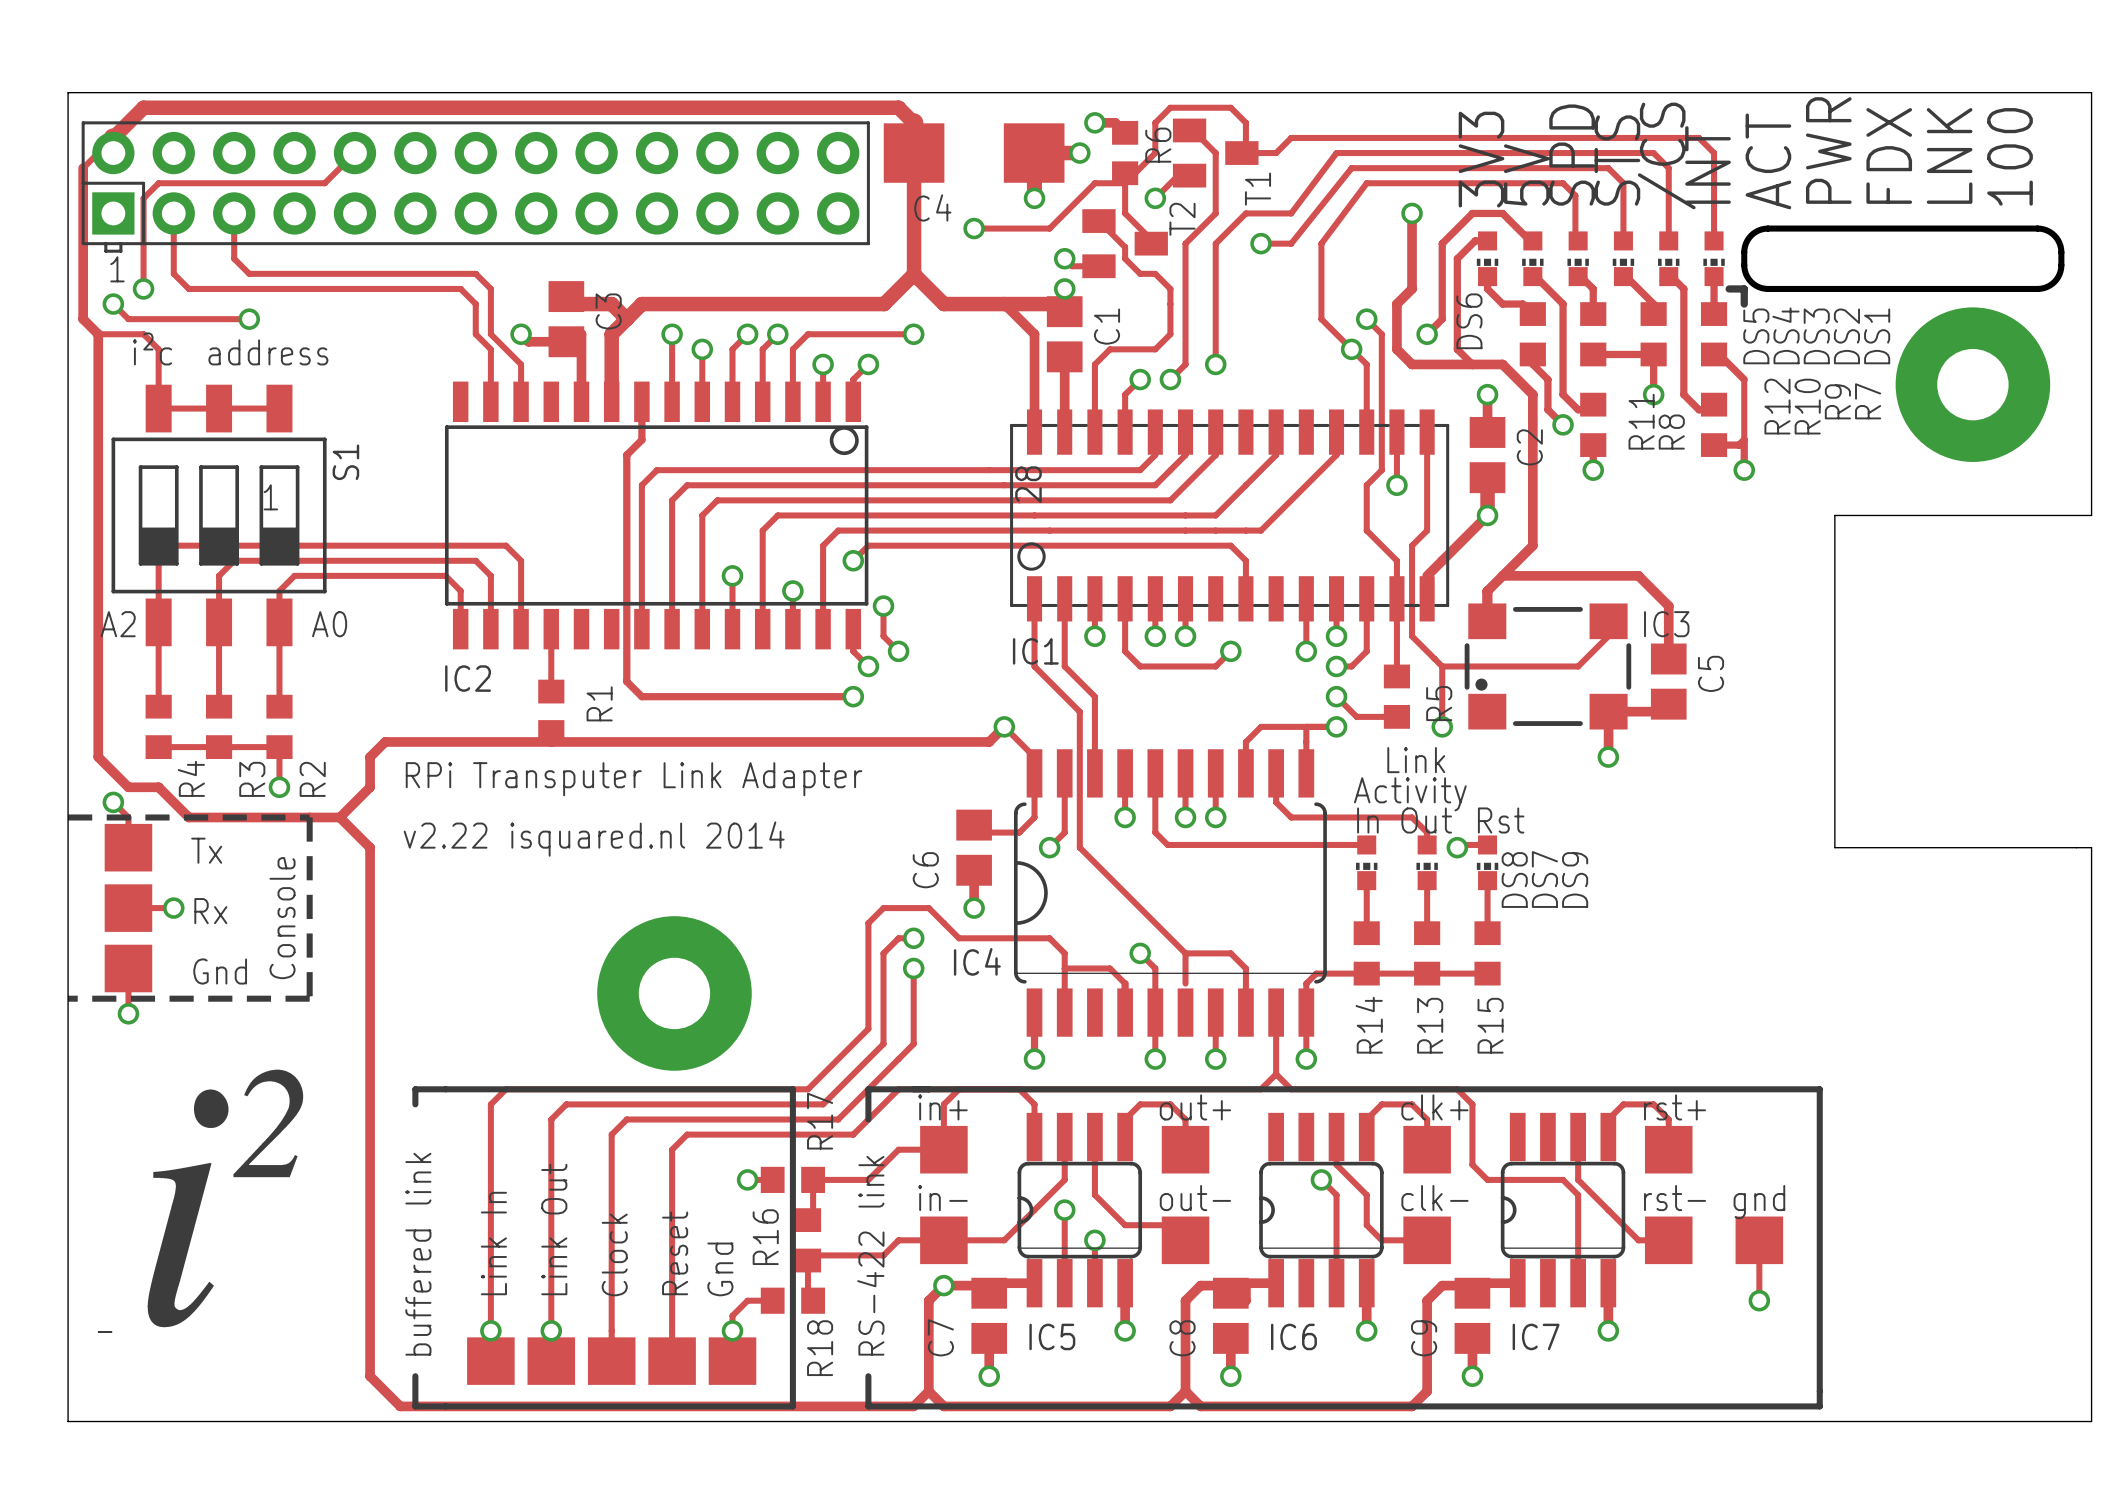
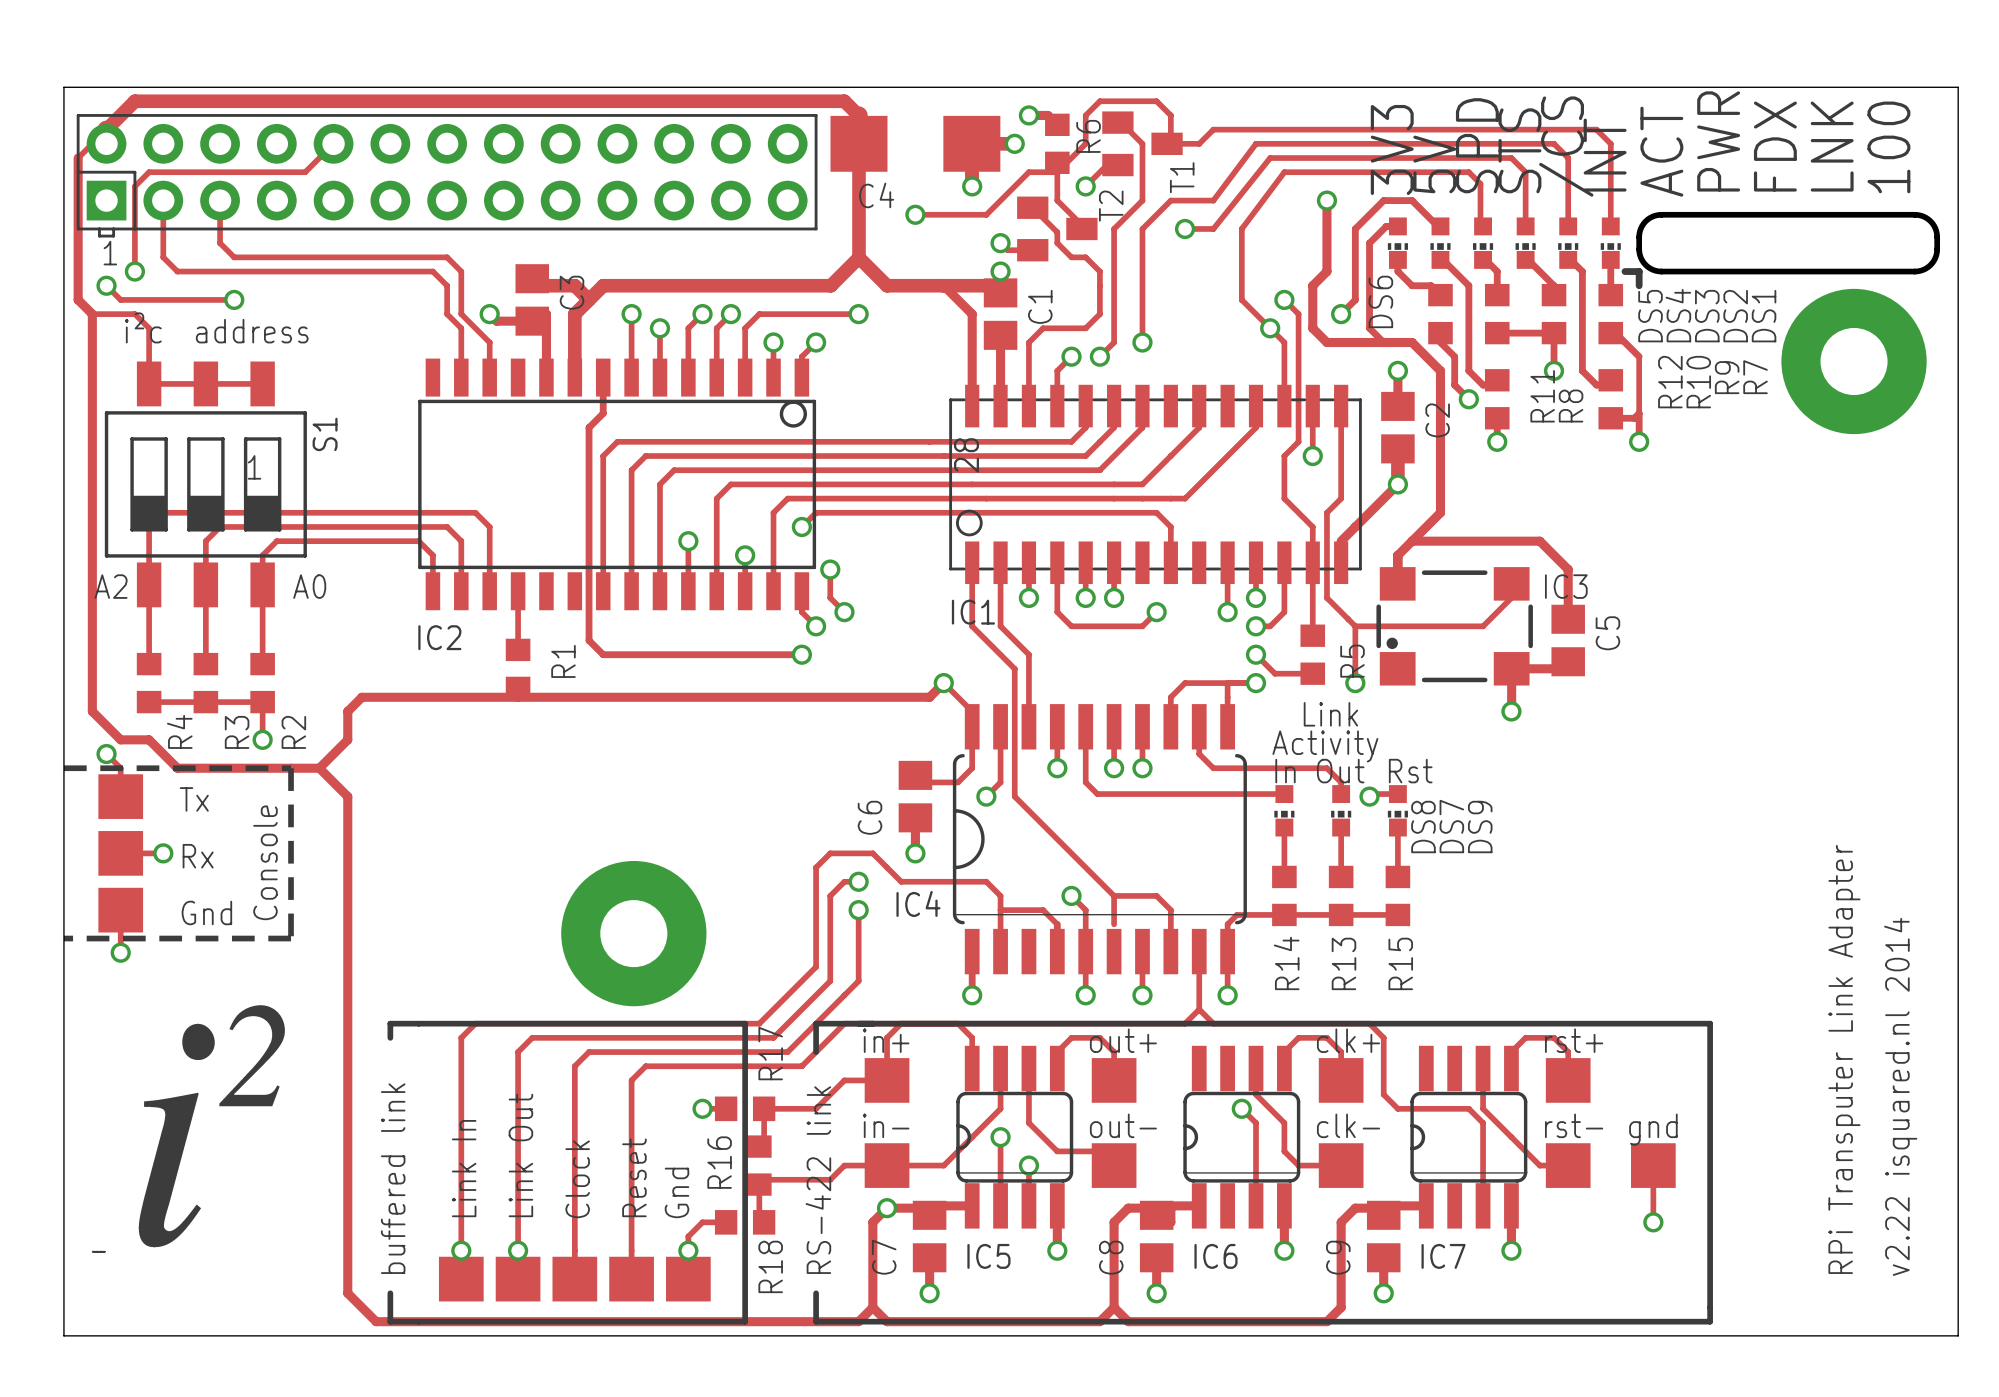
board edge: (68, 92) (2091, 92) (2091, 515) (1834, 515) (1834, 847) (2091, 847) (2091, 1421) (2083, 1421) -> (63, 87) (1958, 87) (1958, 1335)
text: RPi Transputer Link Adapter (634, 779) -> none
text: v2.22 isquared.nl 2014 (594, 839) -> none
text: none -> RPi Transputer Link Adapter (1844, 1059)
text: none -> v2.22 isquared.nl 2014 (1900, 1096)

